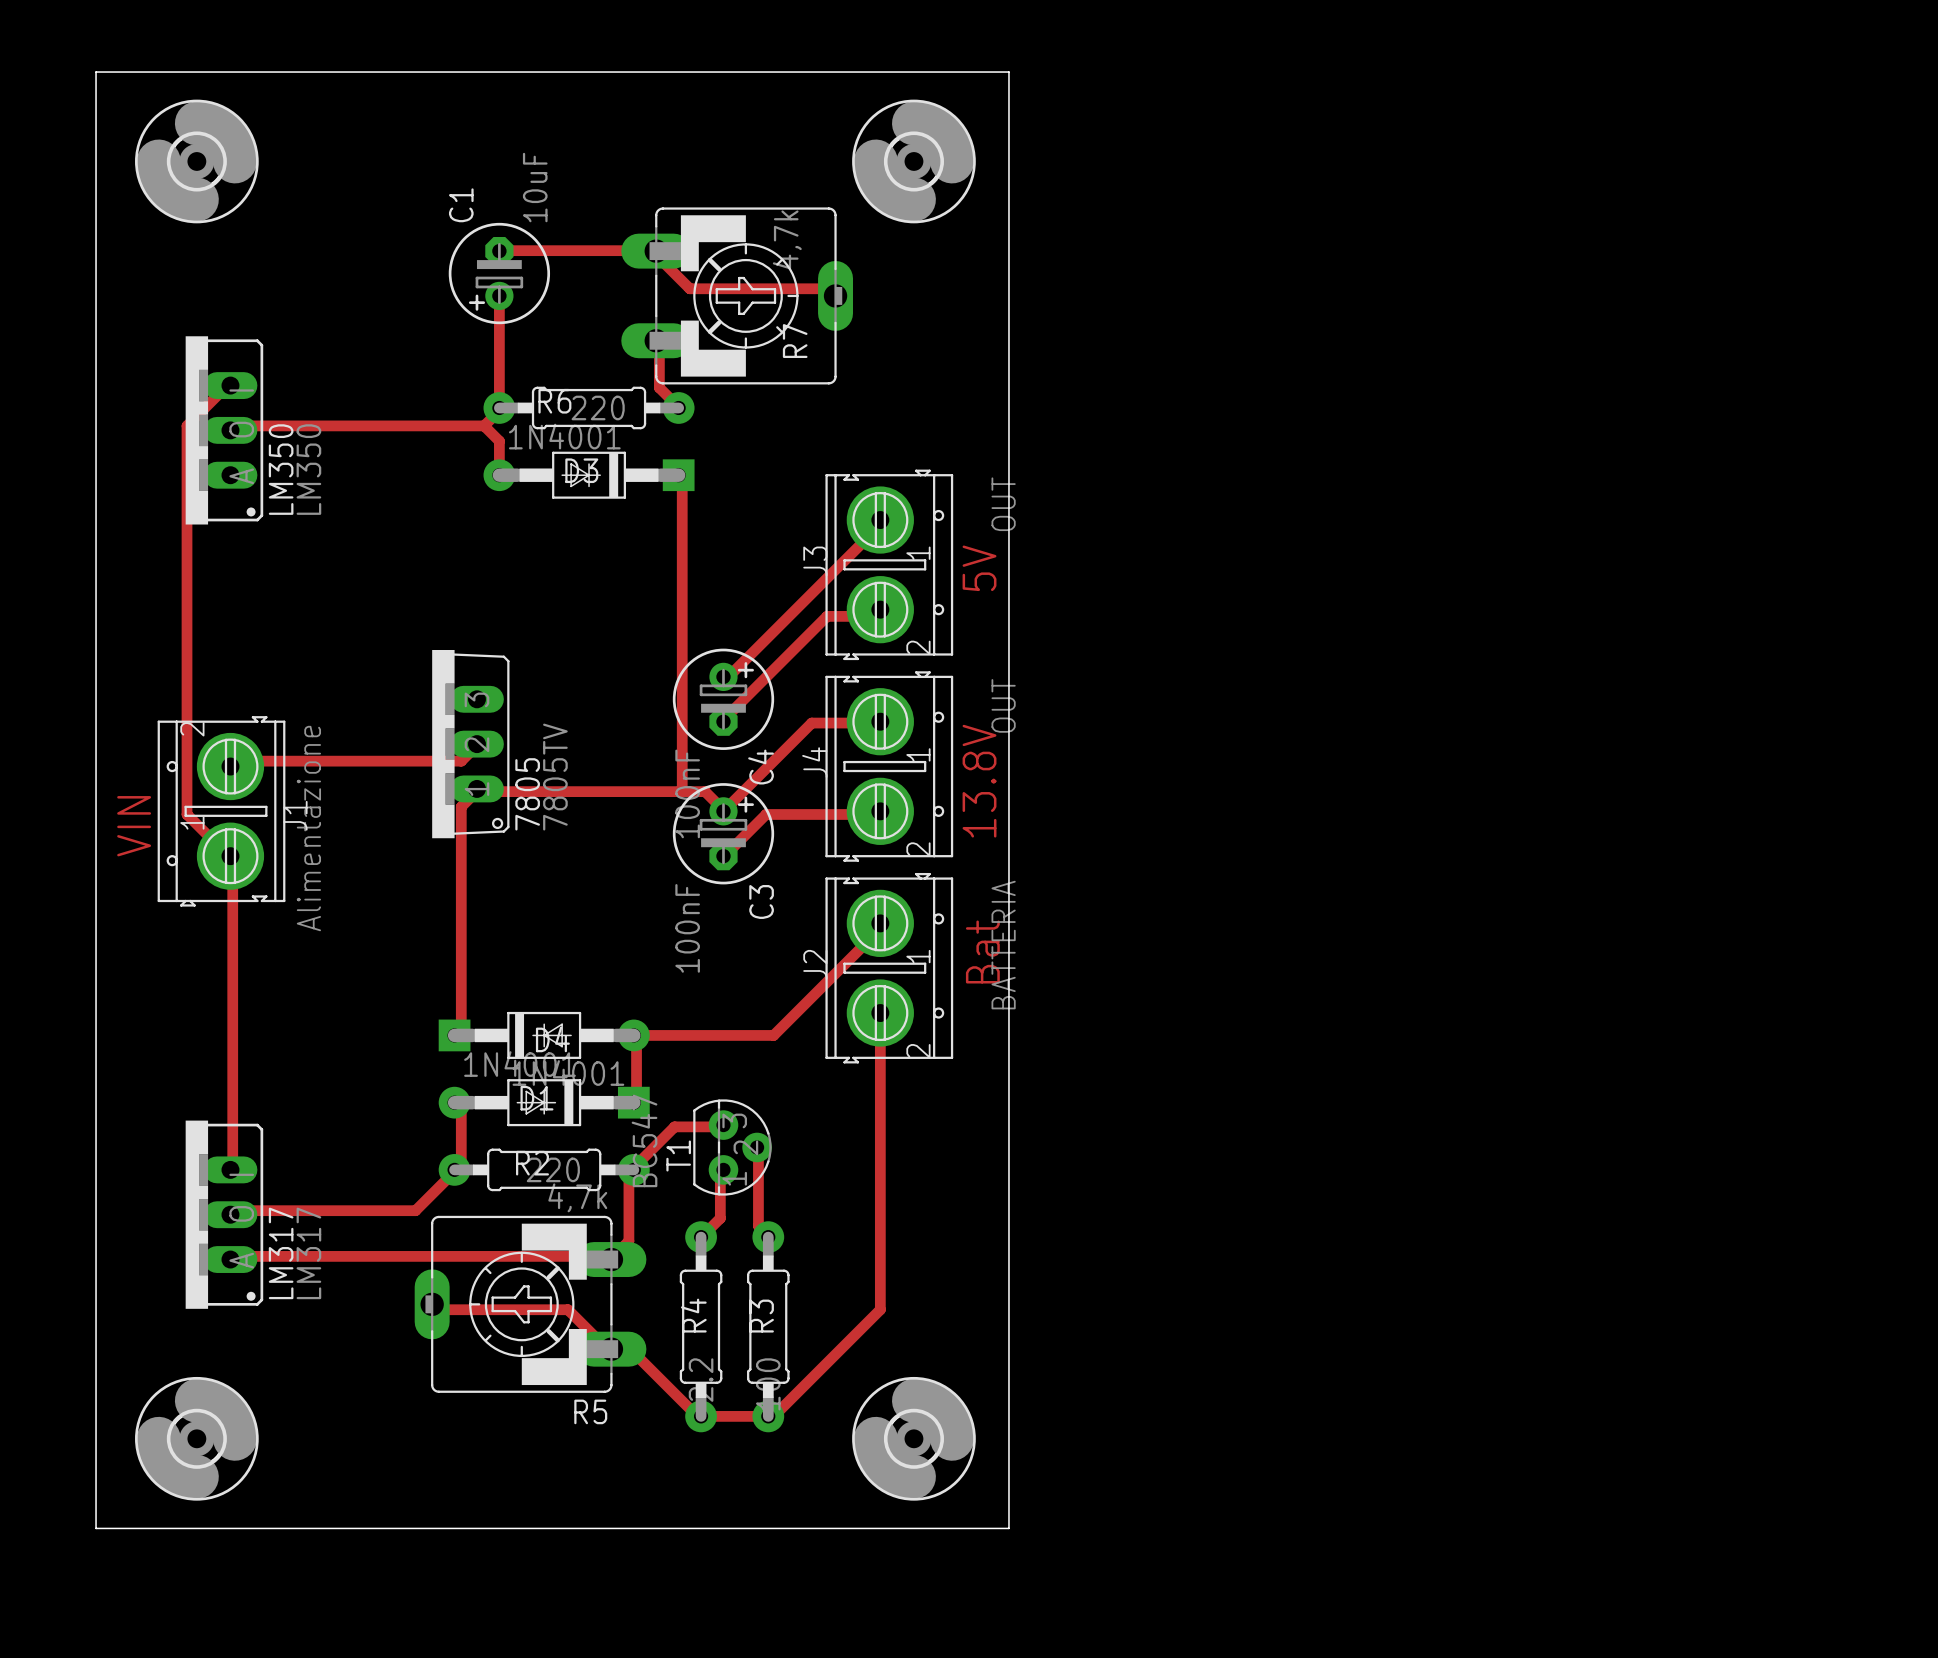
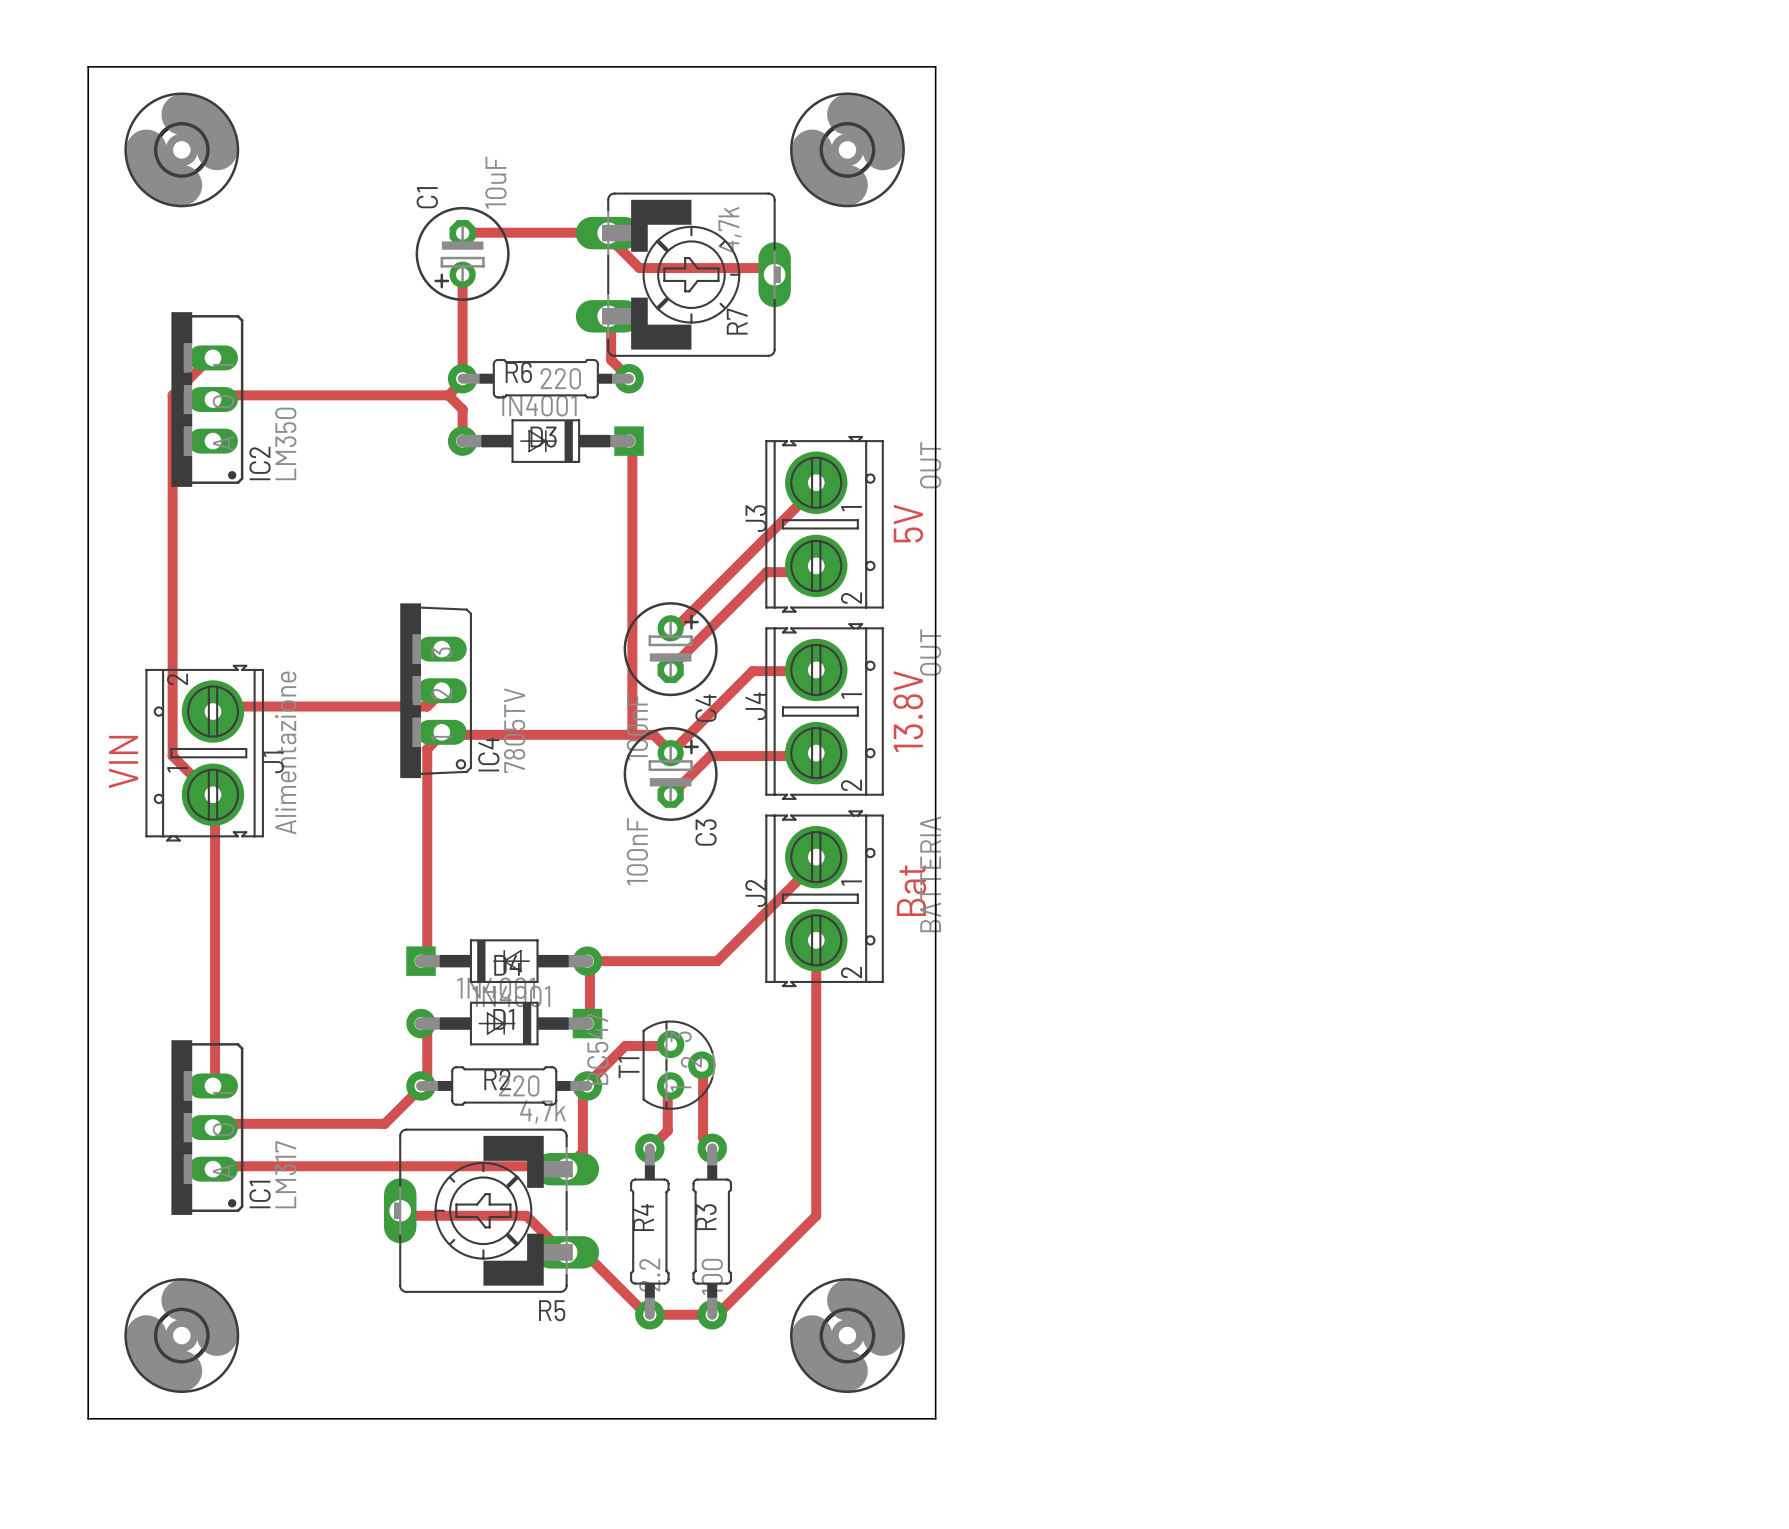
LM350 name: LM350 (281, 469) -> IC2 (260, 463)
7805 name: 7805 (527, 794) -> IC4 (488, 754)
LM317 name: LM317 (281, 1253) -> IC1 (260, 1194)

